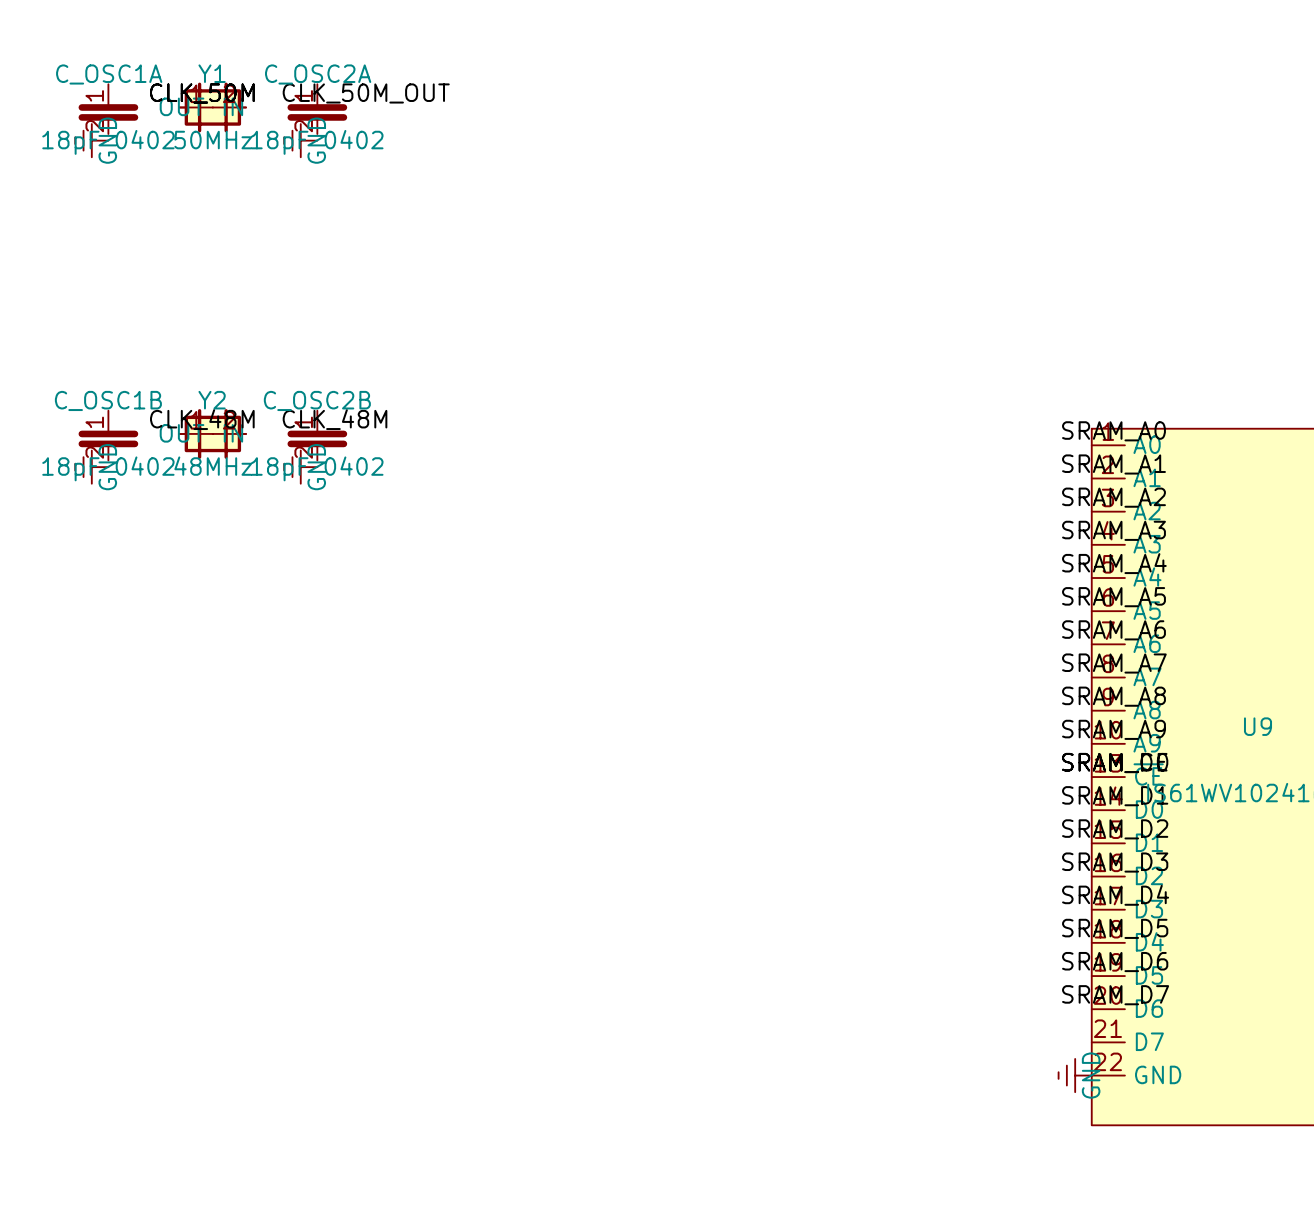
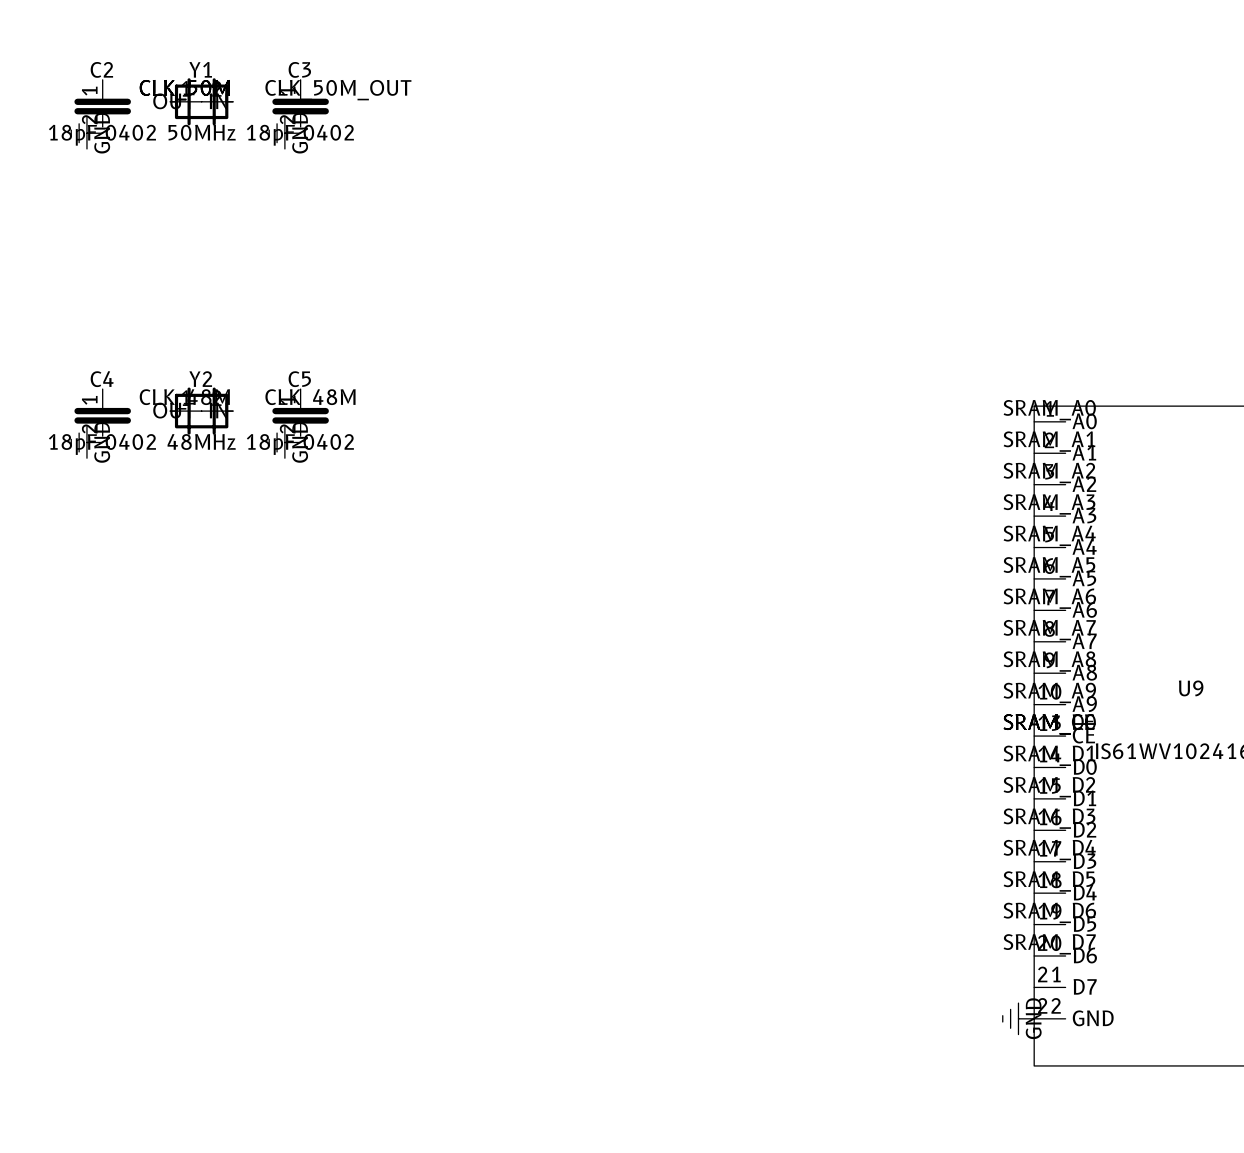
C_OSC1A name: C_OSC1A (109, 74) -> C2 (101, 69)
C_OSC2A name: C_OSC2A (318, 74) -> C3 (299, 69)
C_OSC1B name: C_OSC1B (108, 400) -> C4 (102, 379)
C_OSC2B name: C_OSC2B (317, 400) -> C5 (299, 379)

